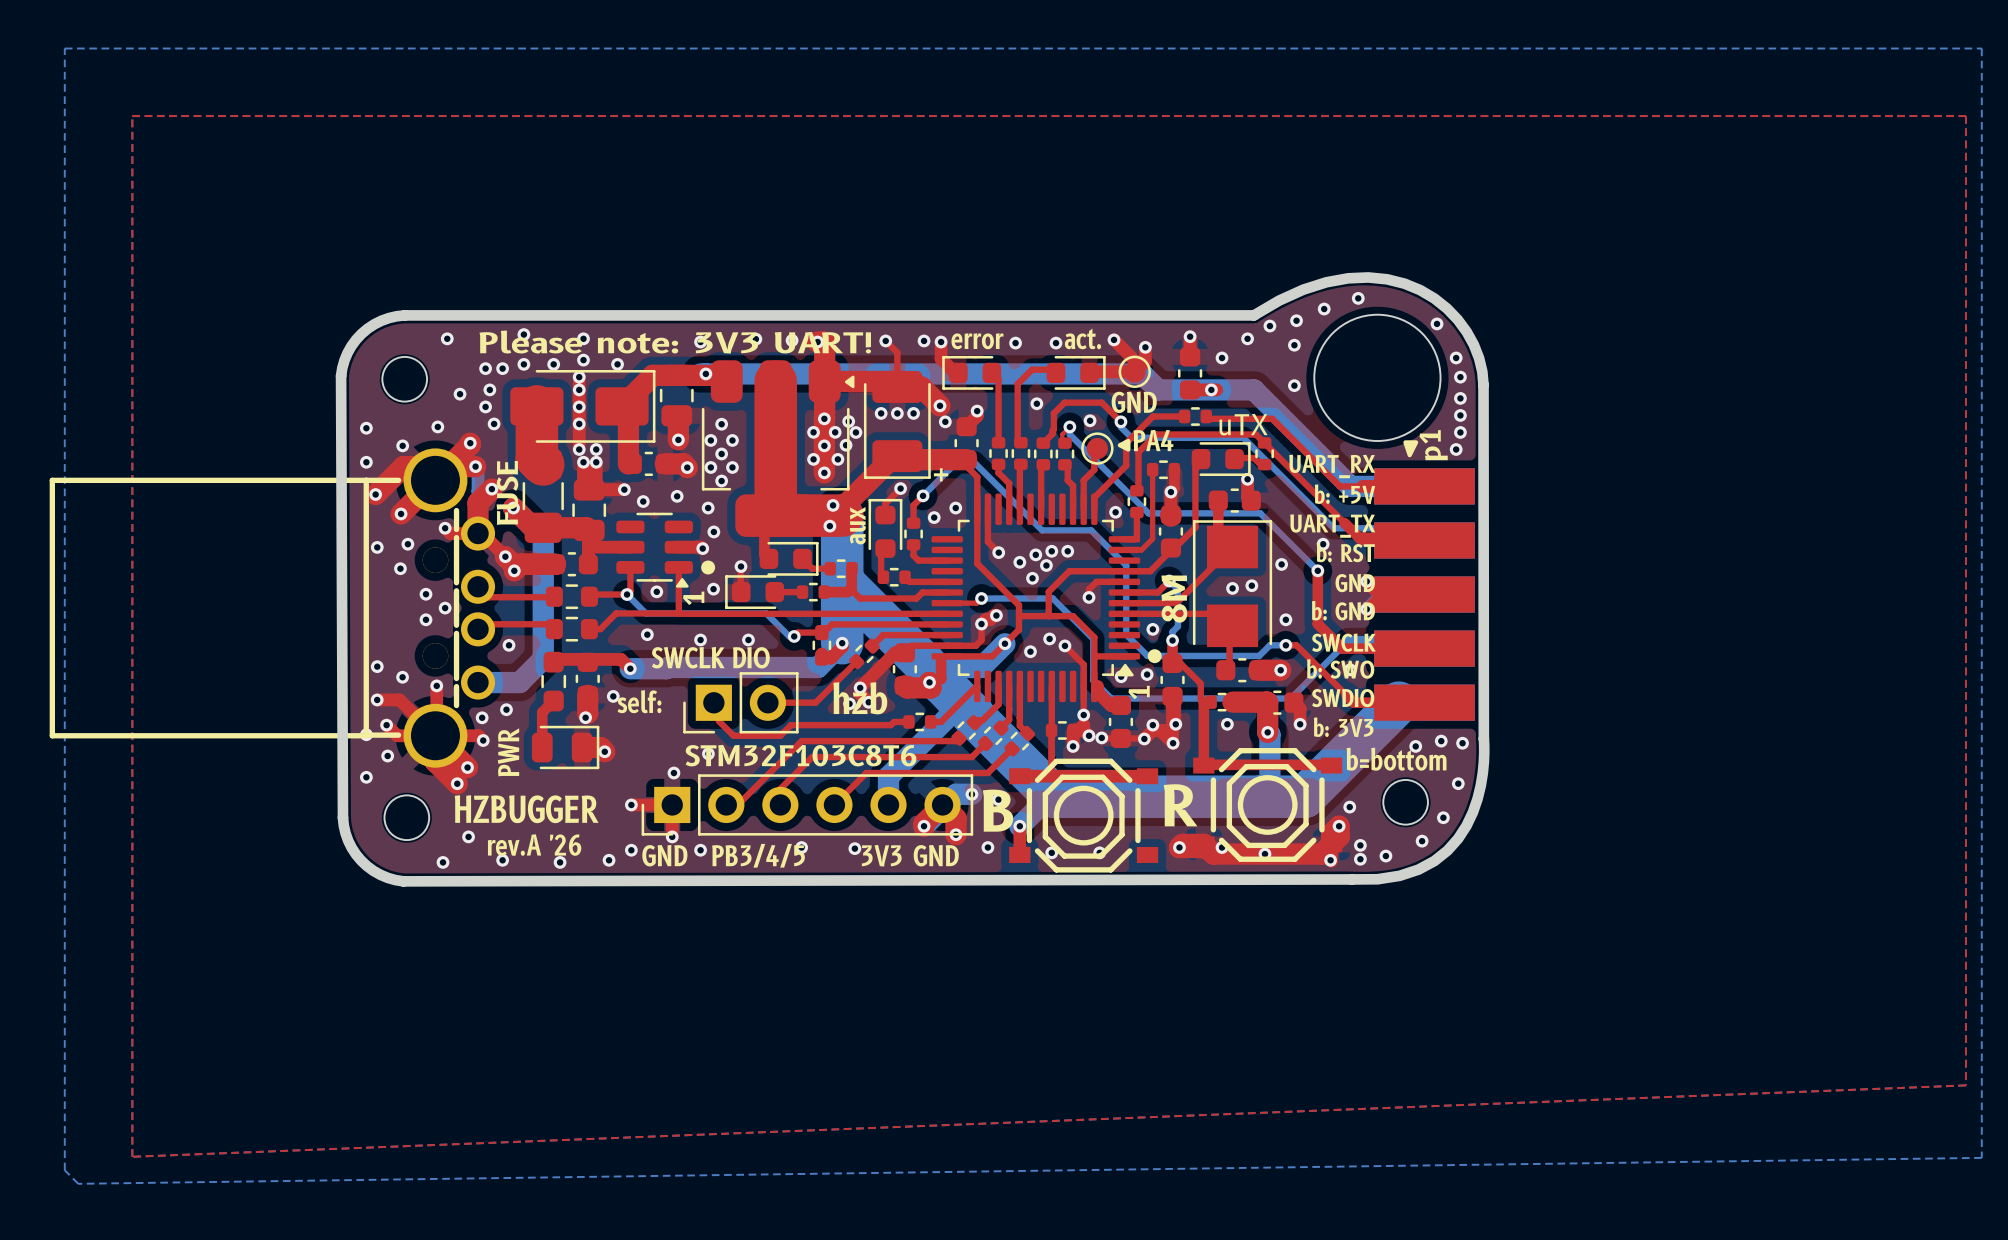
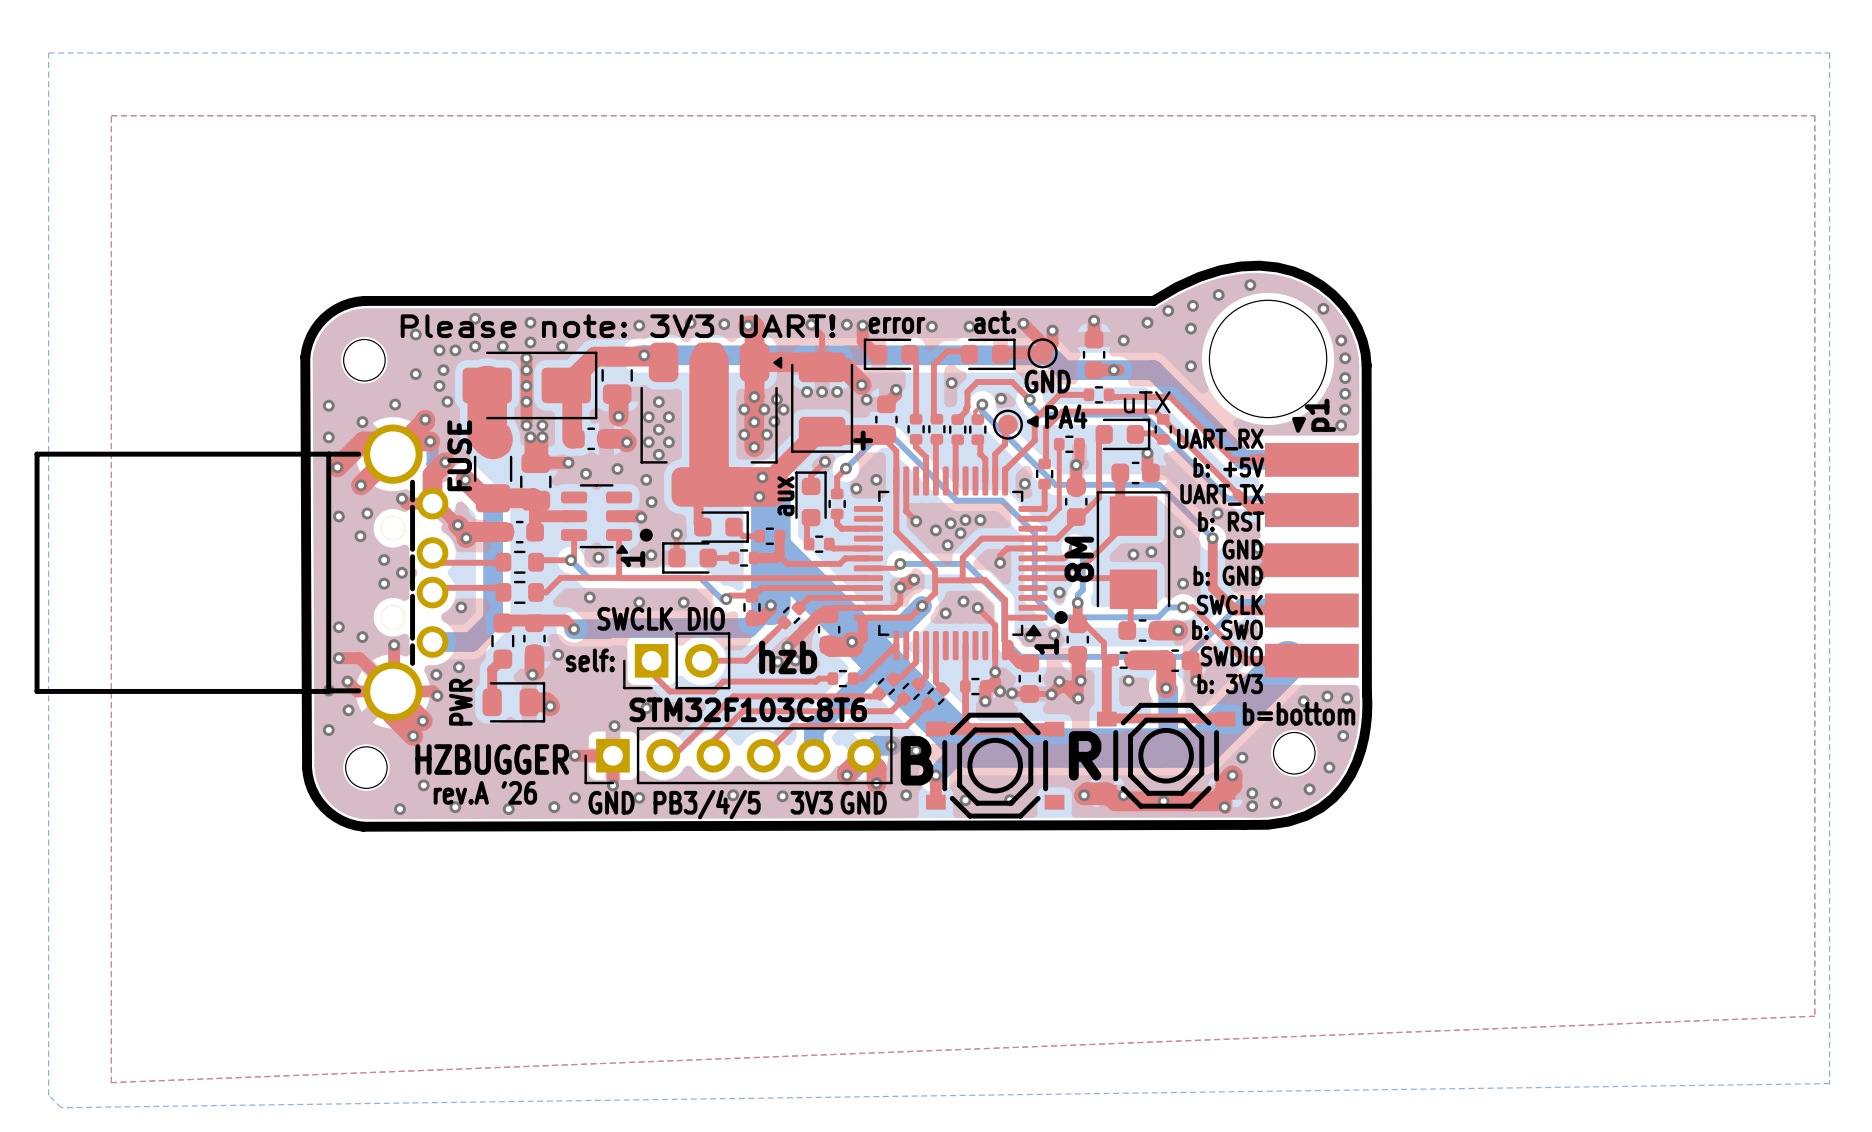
via position: (447, 338) -> (415, 334)

